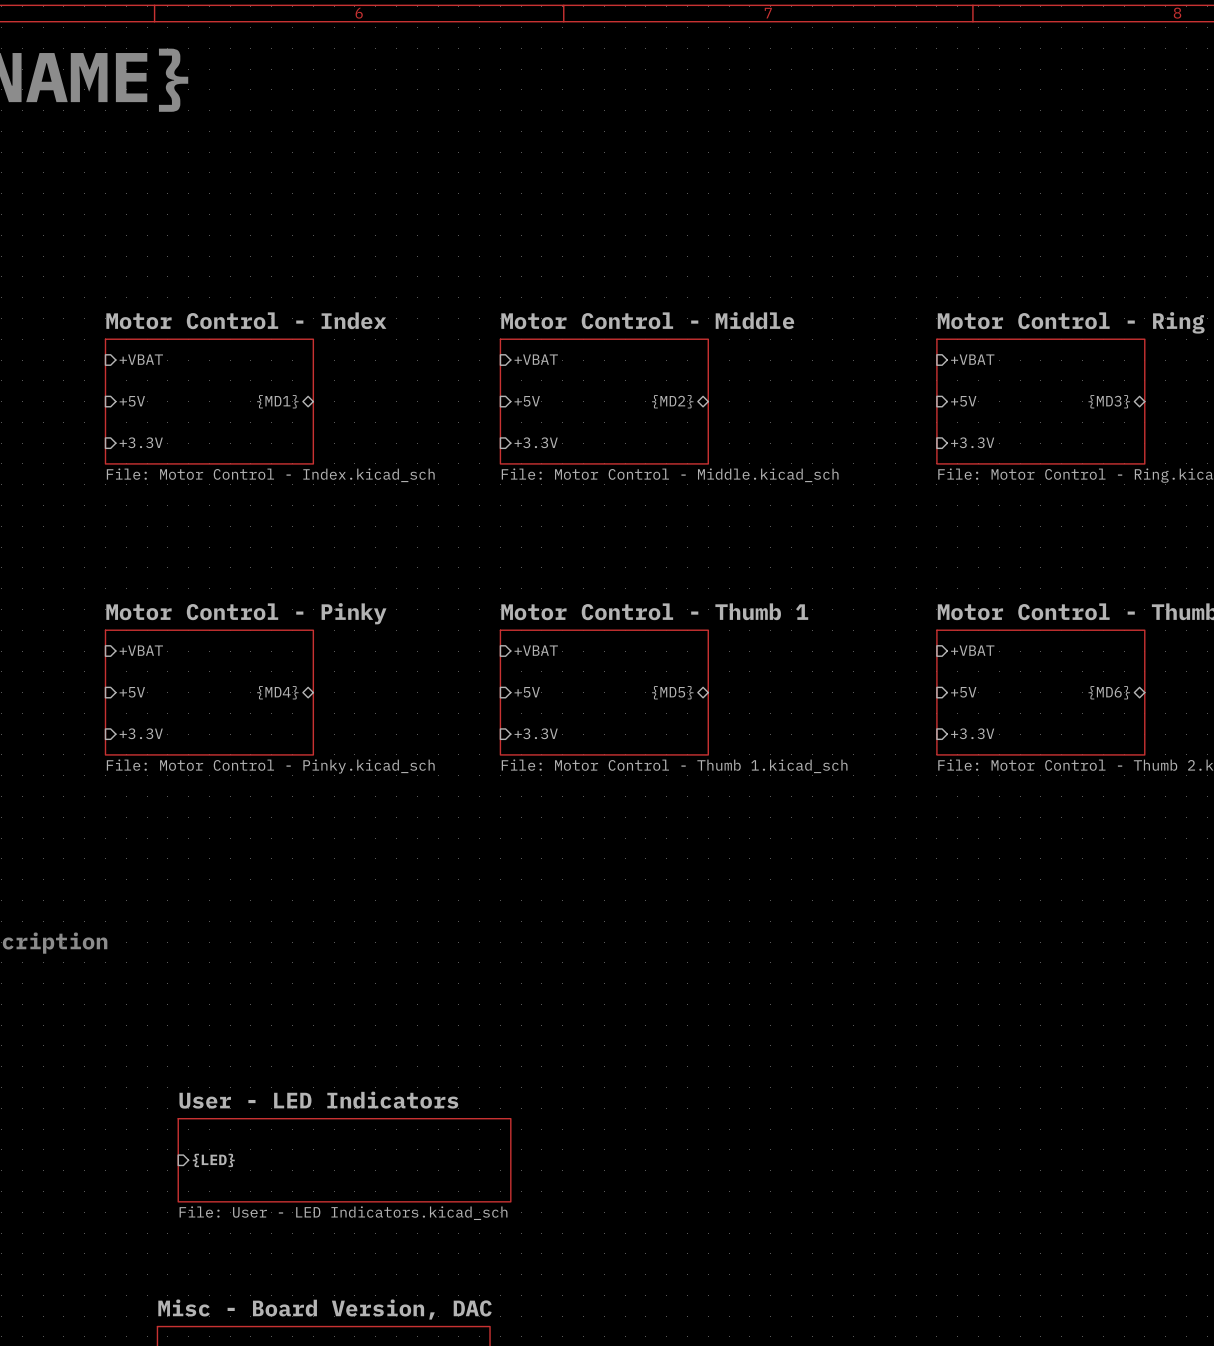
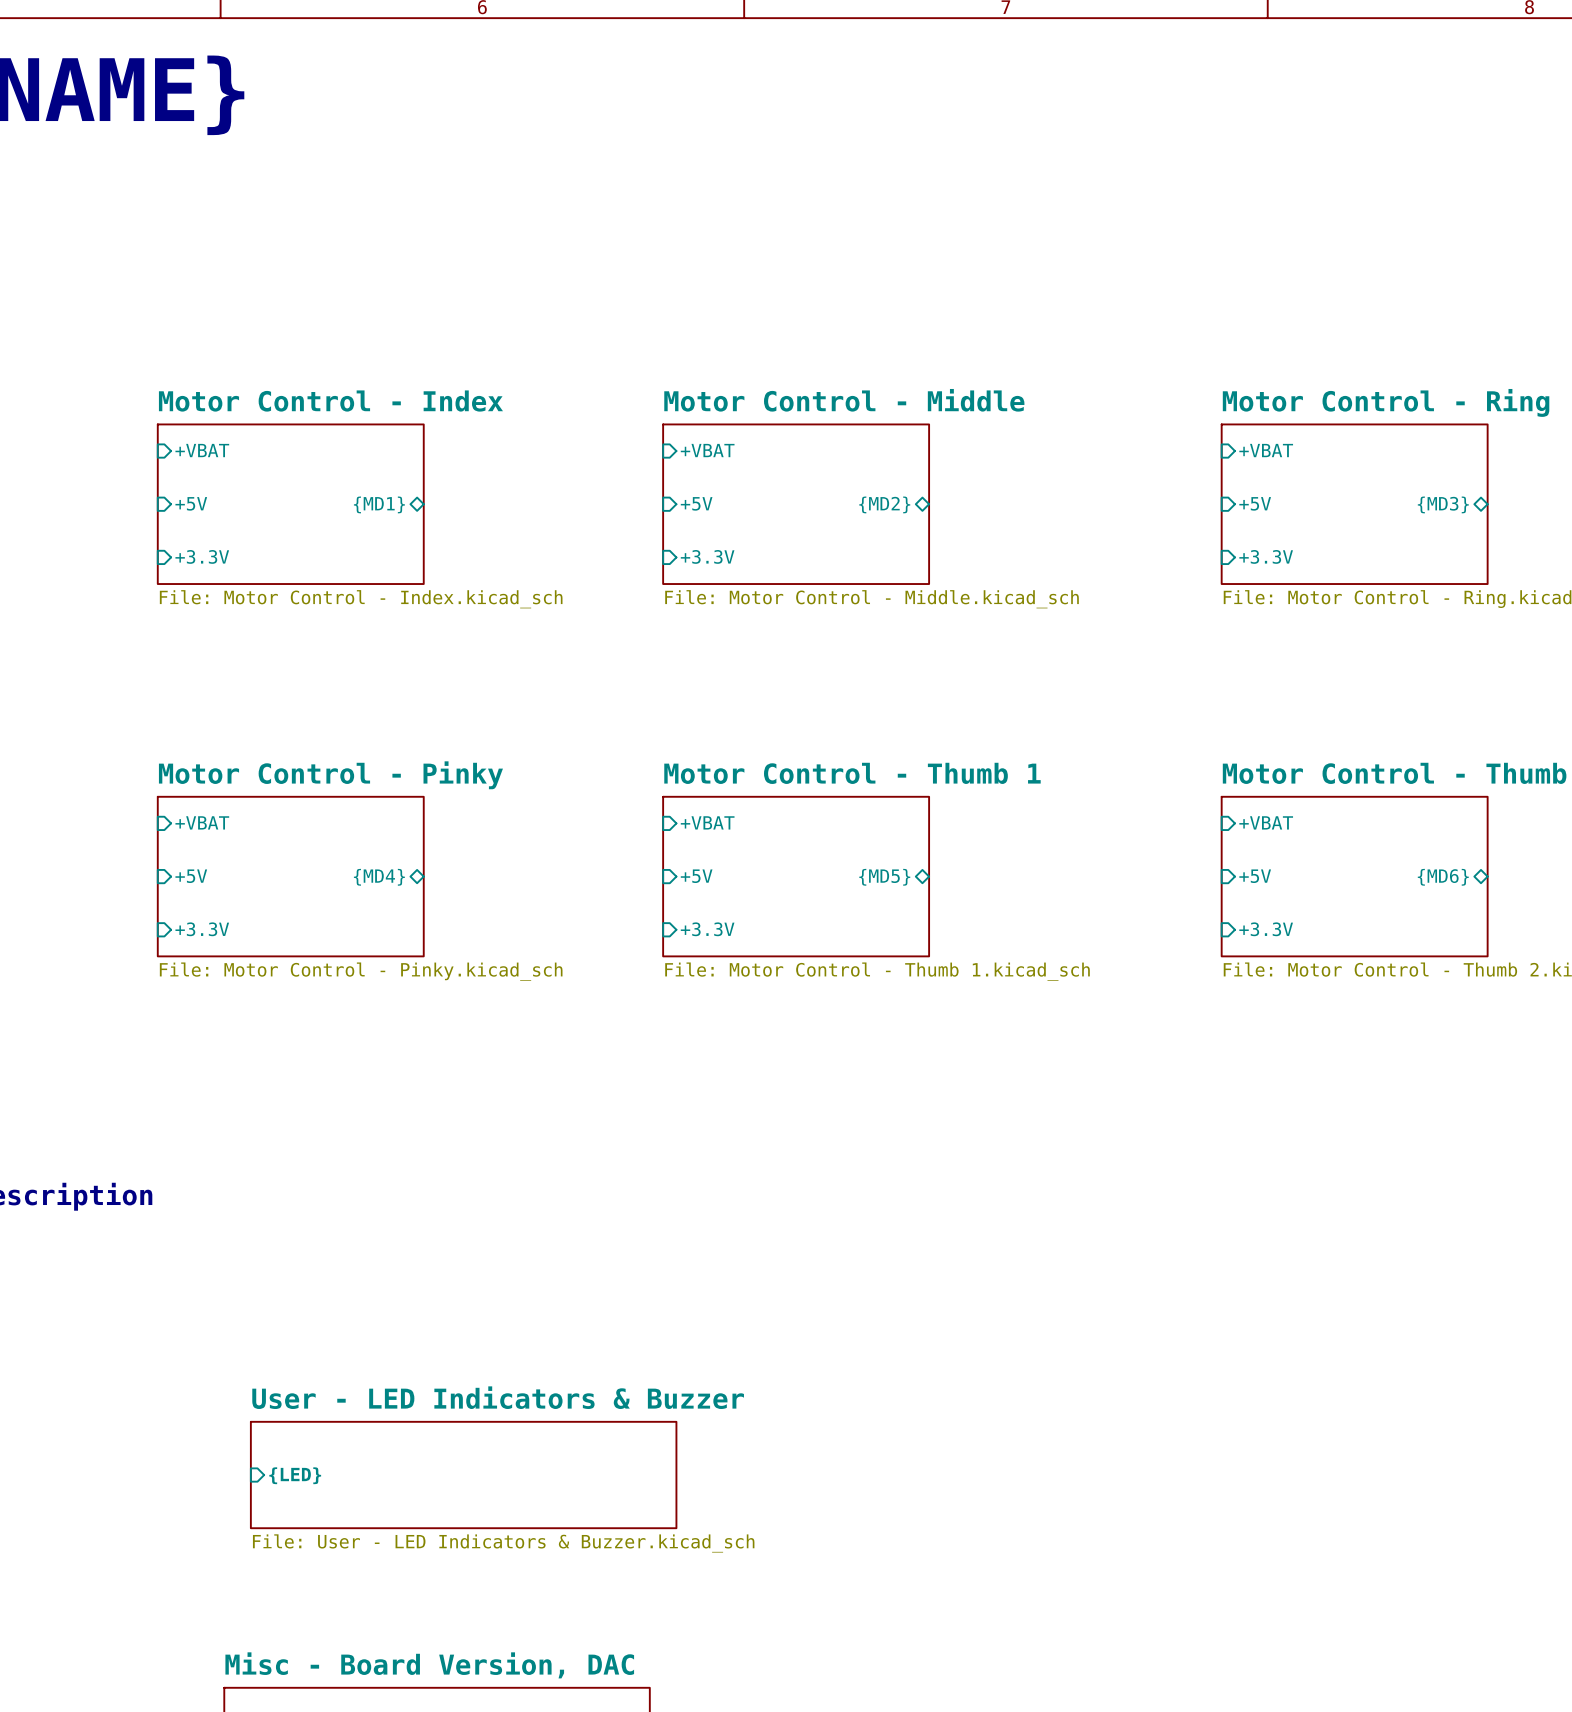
sheet User - LED Indicators name: User - LED Indicators (318, 1100) -> User - LED Indicators & Buzzer (498, 1397)
sheet User - LED Indicators value: File: User - LED Indicators.kicad_sch (343, 1213) -> File: User - LED Indicators & Buzzer.kicad_sch (503, 1543)

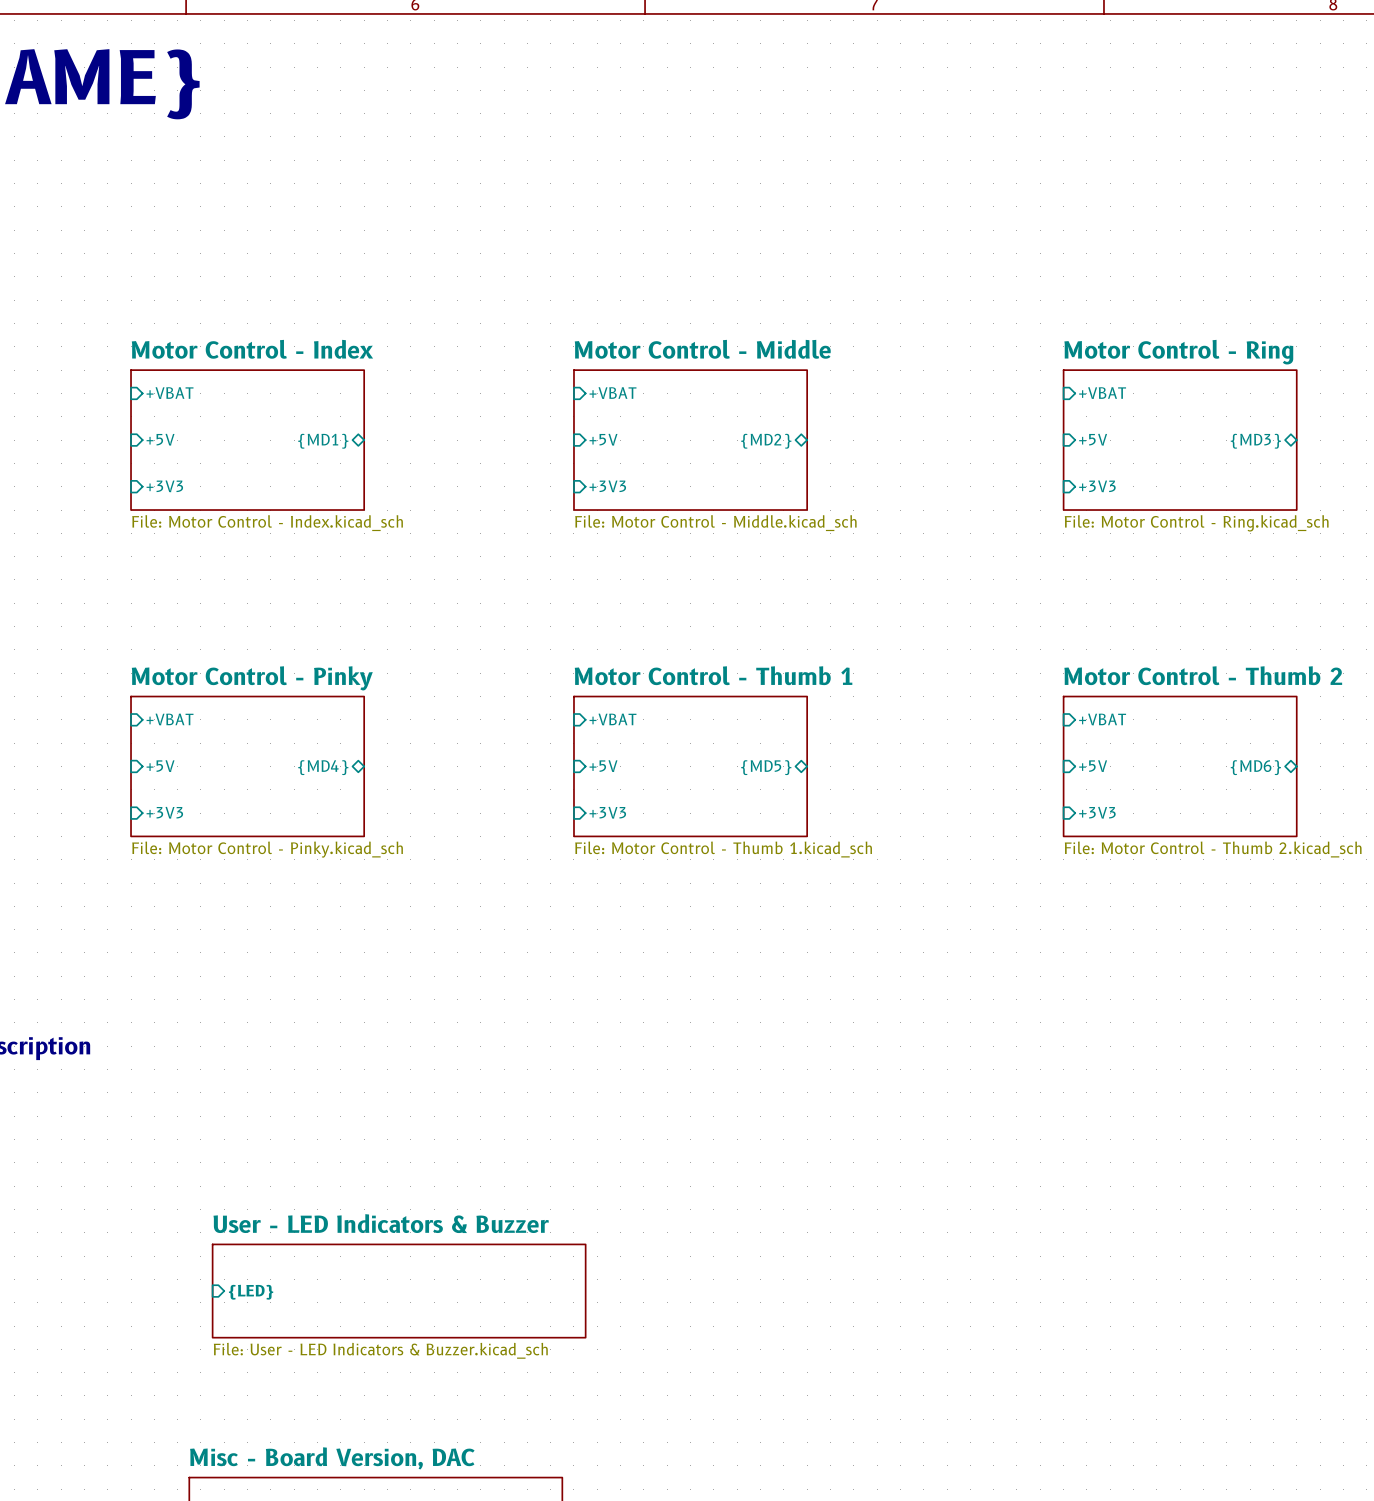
sheet pin: +3.3V (202, 556) -> +3V3 (164, 486)
sheet pin: +3.3V (707, 556) -> +3V3 (607, 486)
sheet pin: +3.3V (1266, 556) -> +3V3 (1097, 486)
sheet pin: +3.3V (202, 929) -> +3V3 (164, 812)
sheet pin: +3.3V (707, 929) -> +3V3 (607, 812)
sheet pin: +3.3V (1266, 929) -> +3V3 (1097, 812)

